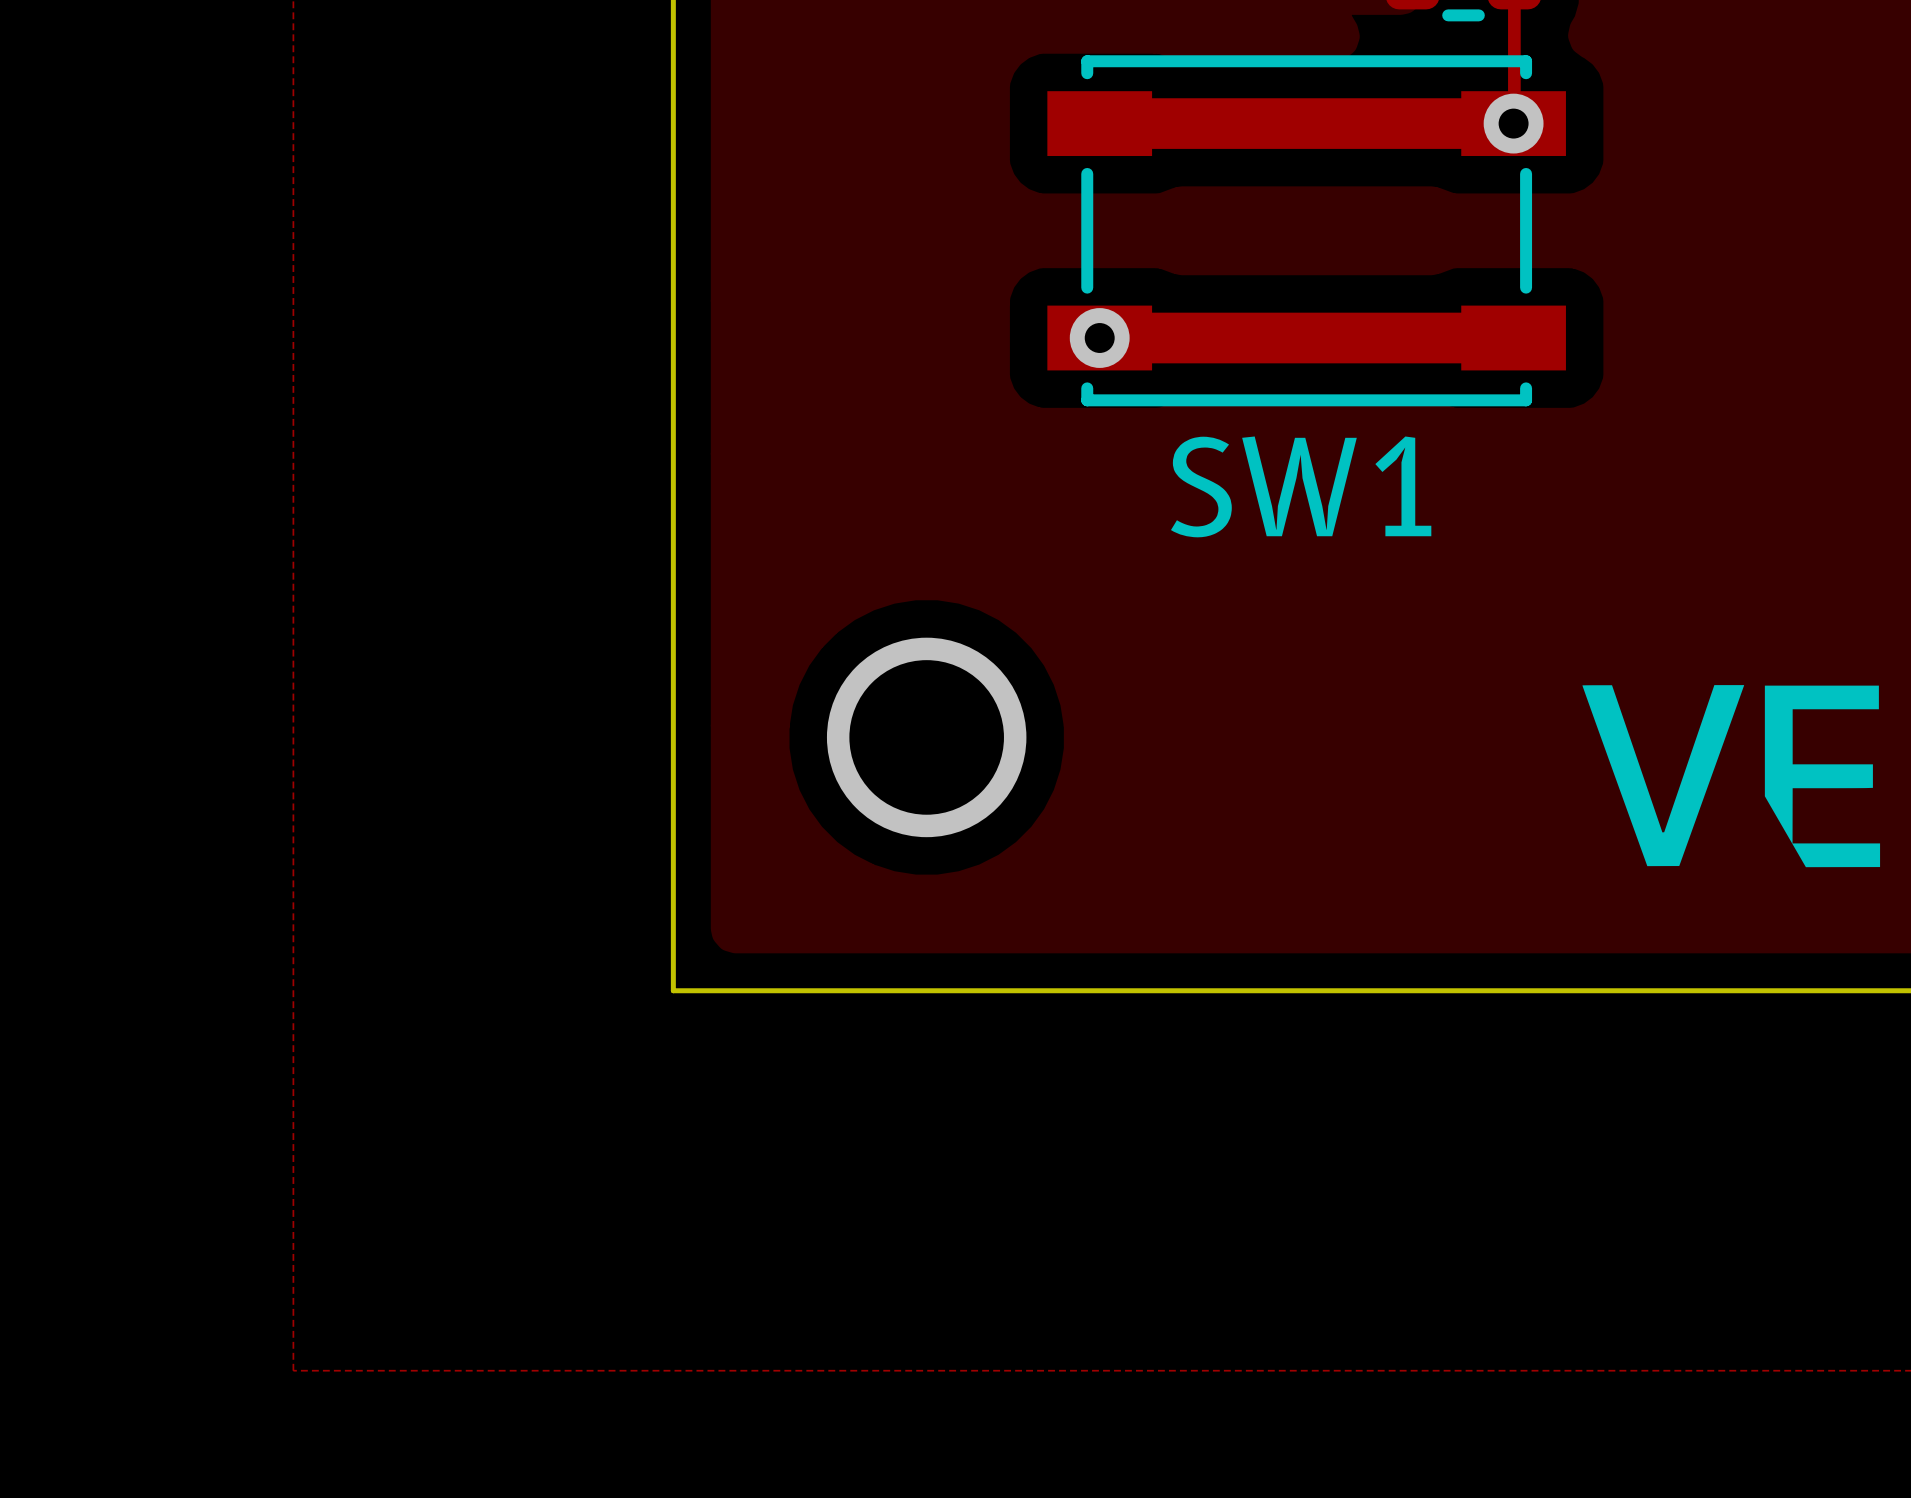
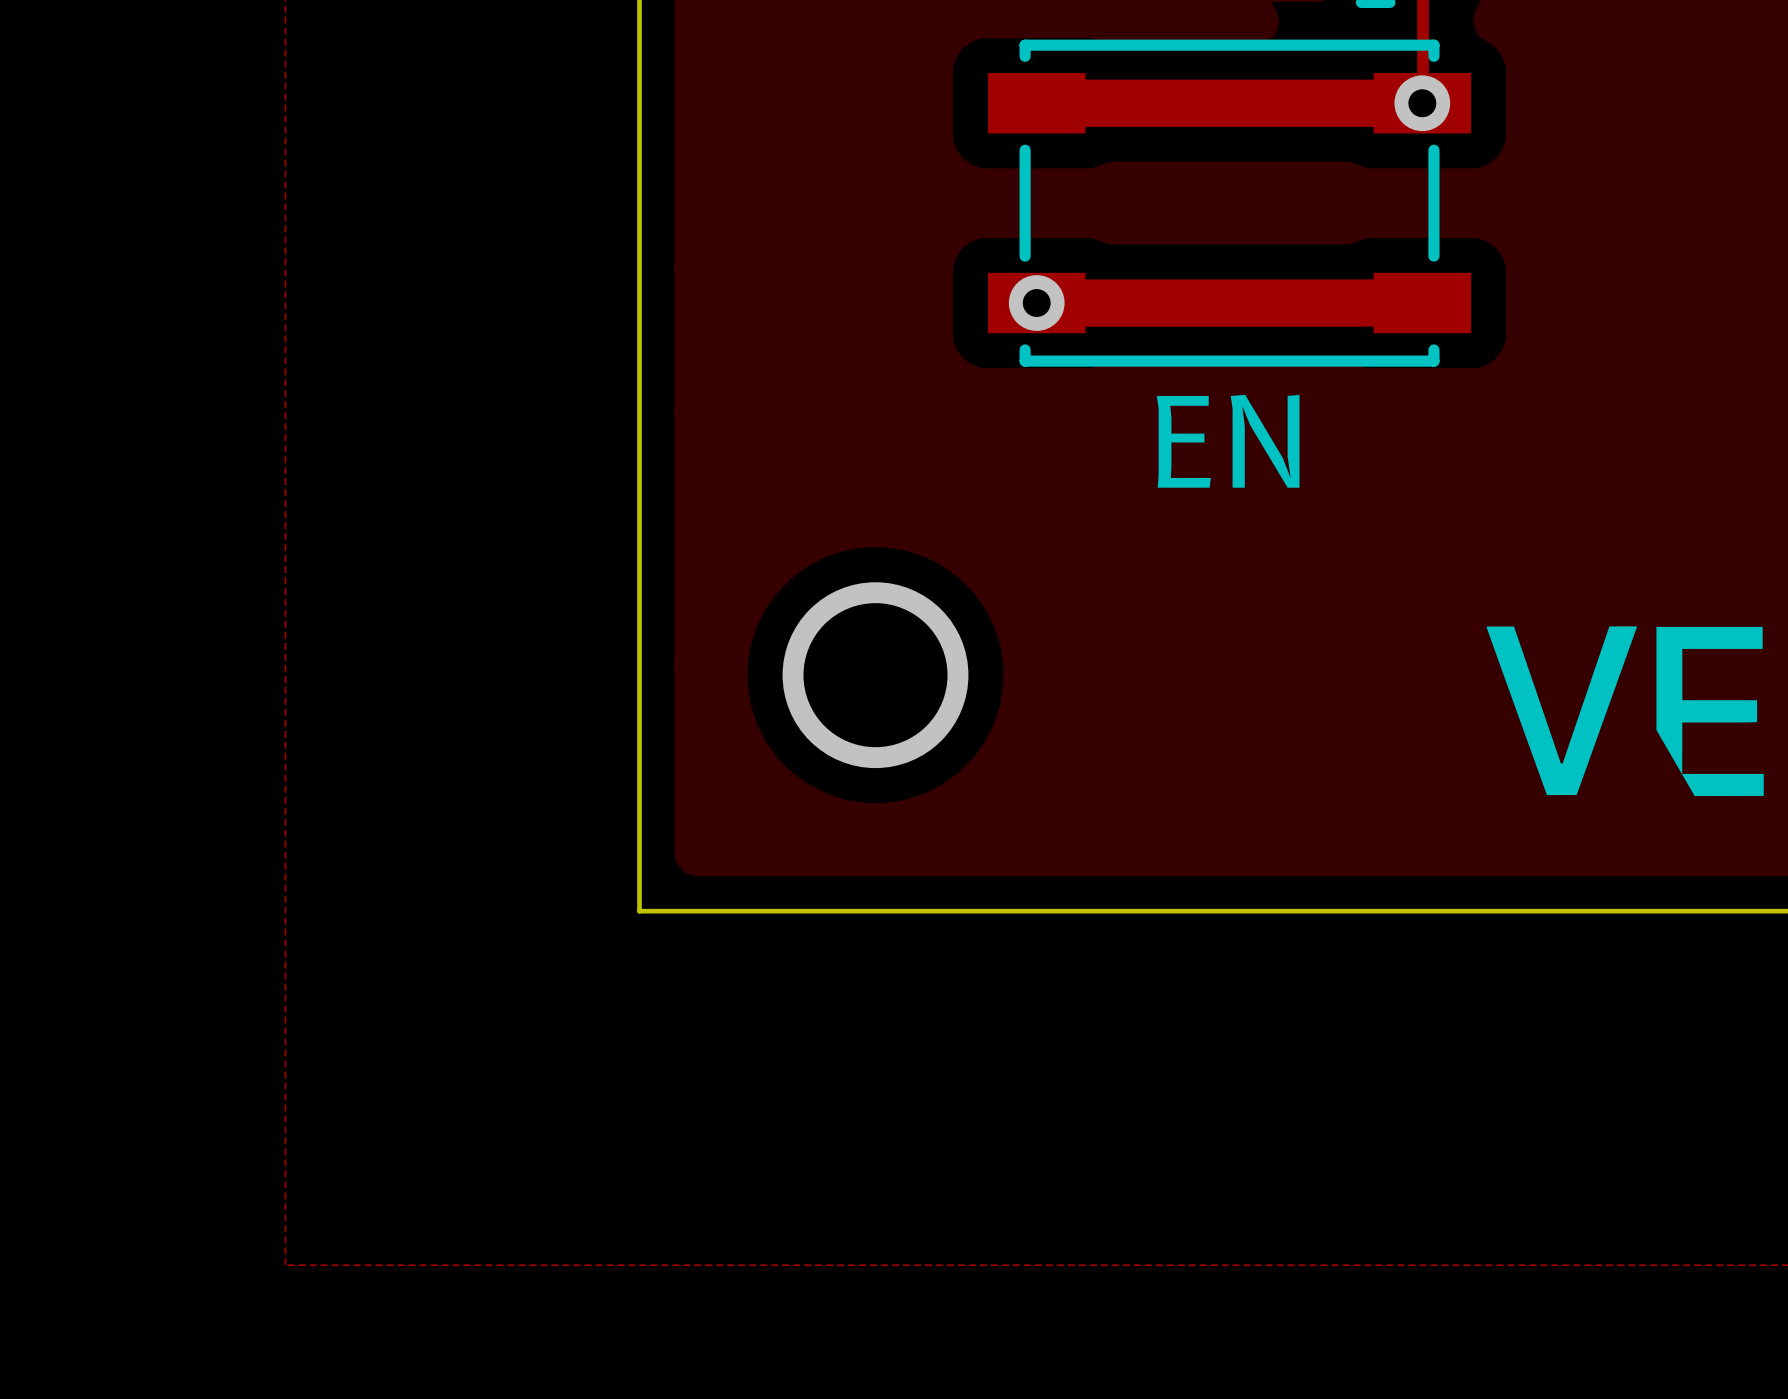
SW1 name: SW1 (1301, 486) -> EN (1228, 441)

